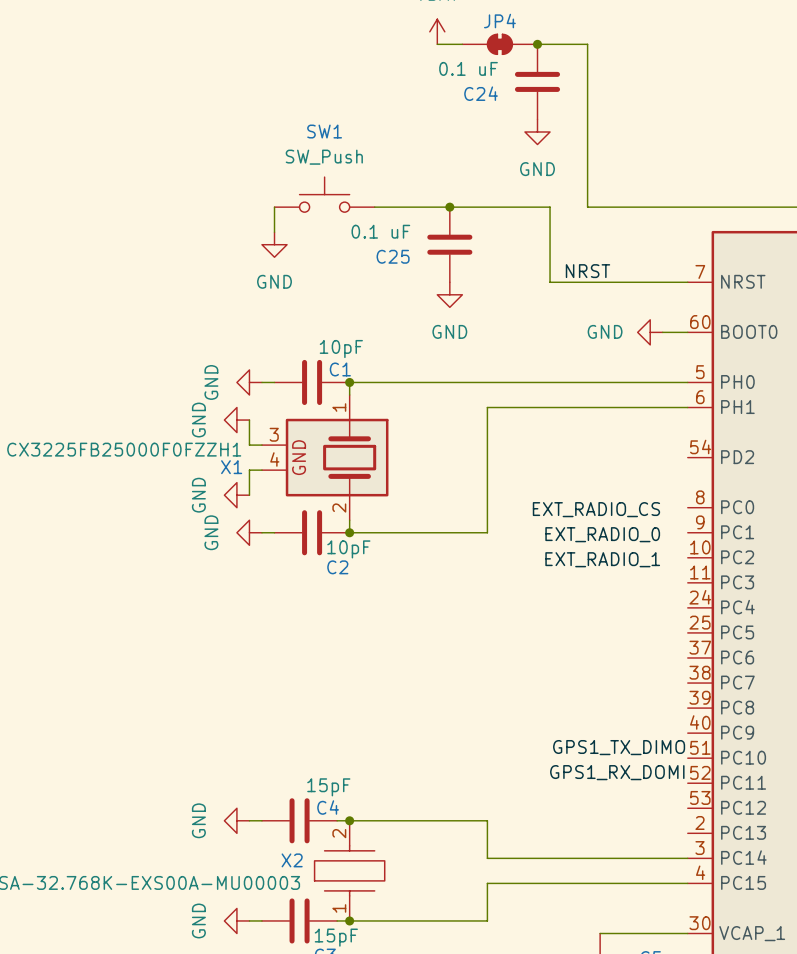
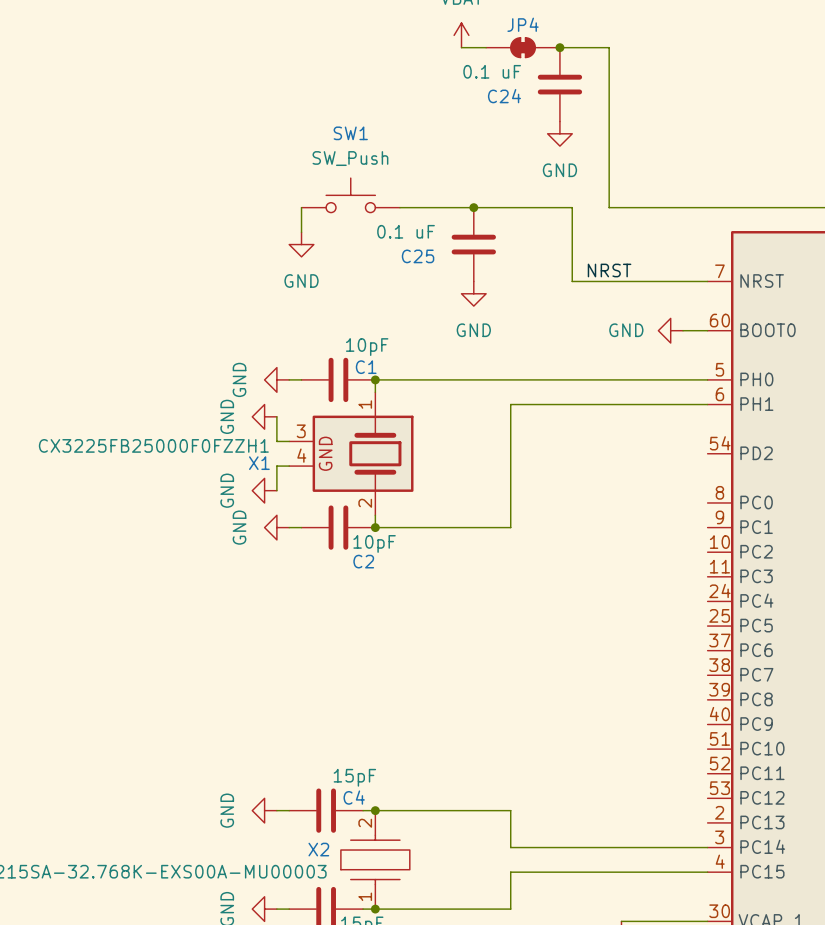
label: EXT_RADIO_CS (596, 509) -> none
label: EXT_RADIO_0 (602, 534) -> none
label: EXT_RADIO_1 (602, 559) -> none
label: GPS1_TX_DIMO (619, 747) -> none
label: GPS1_RX_DOMI (617, 772) -> none

